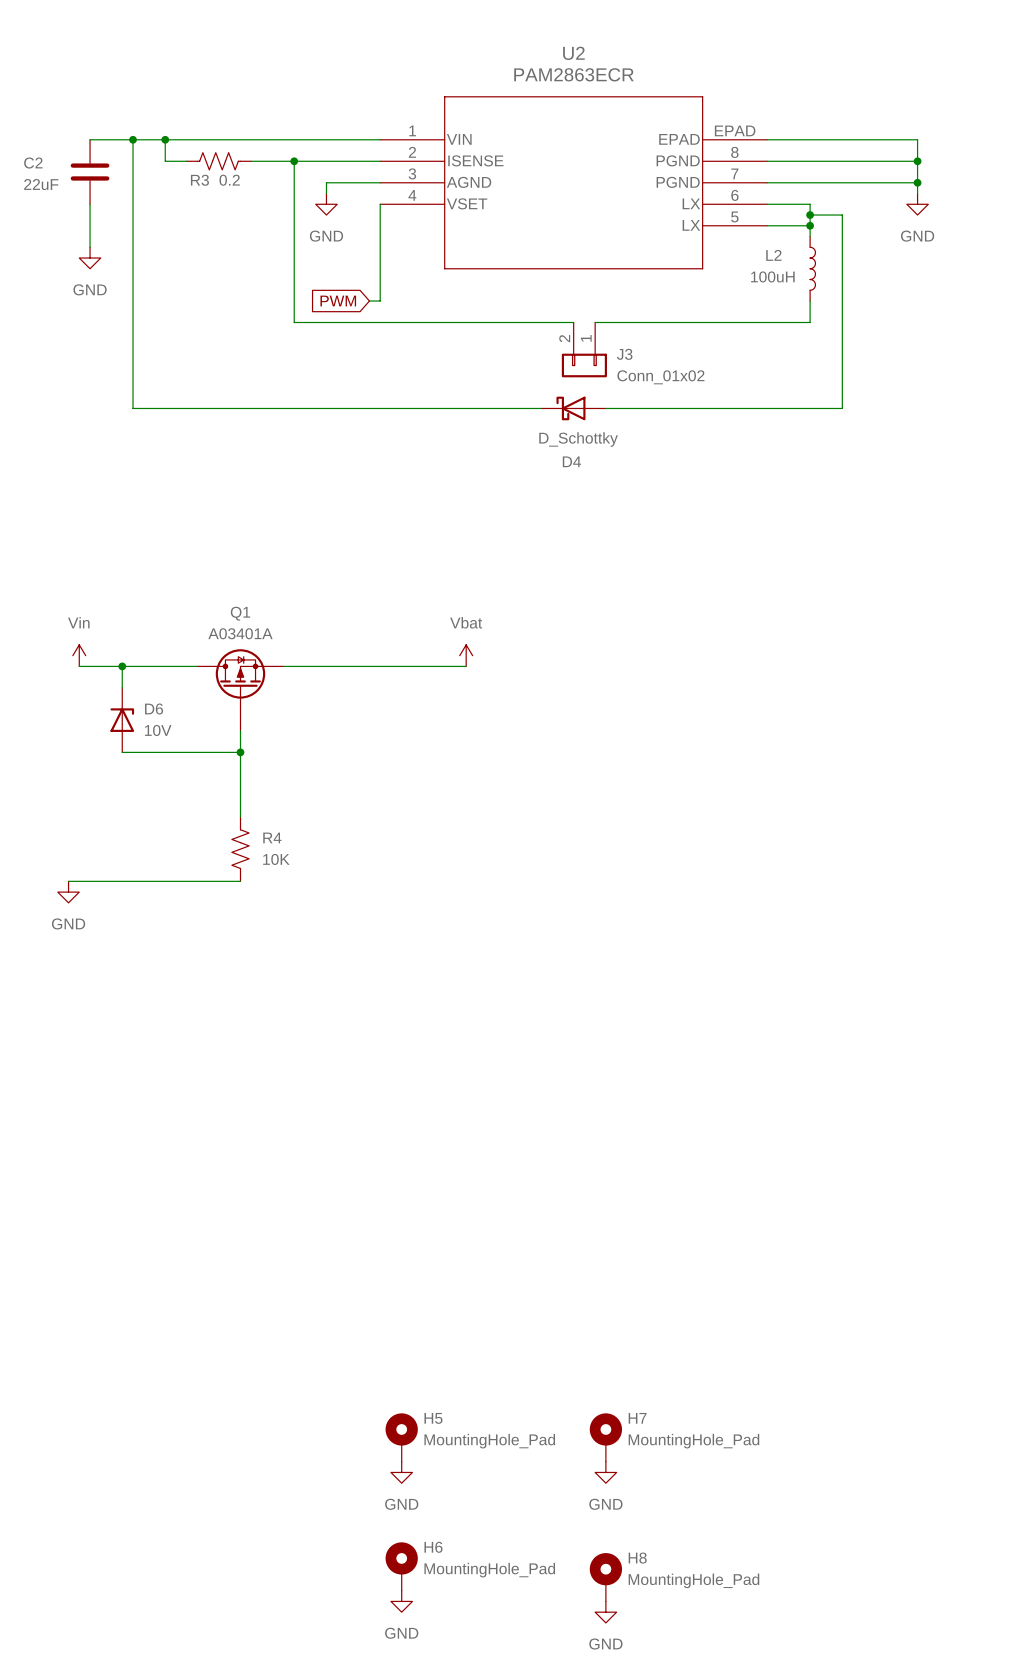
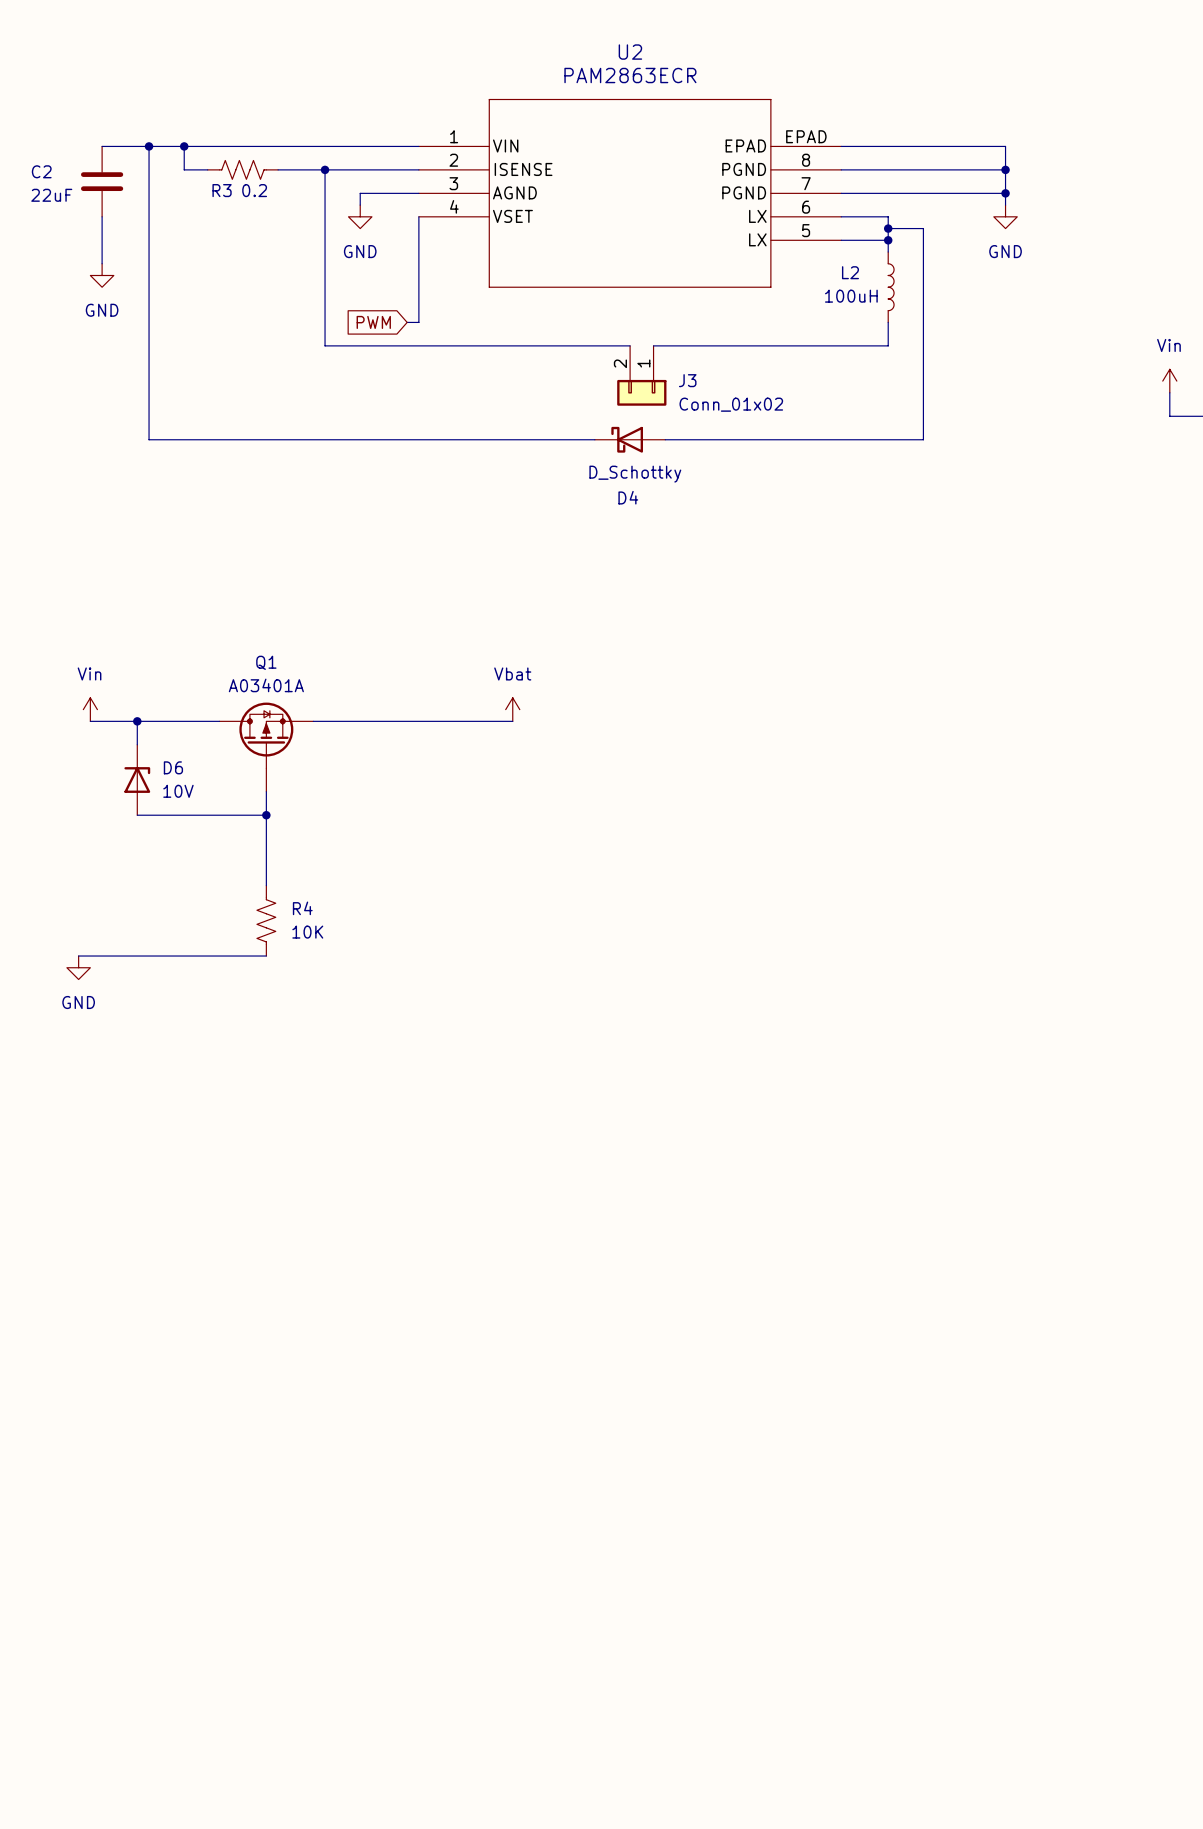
H5: MountingHole_Pad (401, 1437) -> none
H7: MountingHole_Pad (605, 1437) -> none
power symbol: GND (401, 1472) -> none
power symbol: GND (605, 1472) -> none
H6: MountingHole_Pad (401, 1566) -> none
H8: MountingHole_Pad (605, 1577) -> none
power symbol: GND (401, 1601) -> none
power symbol: GND (605, 1612) -> none

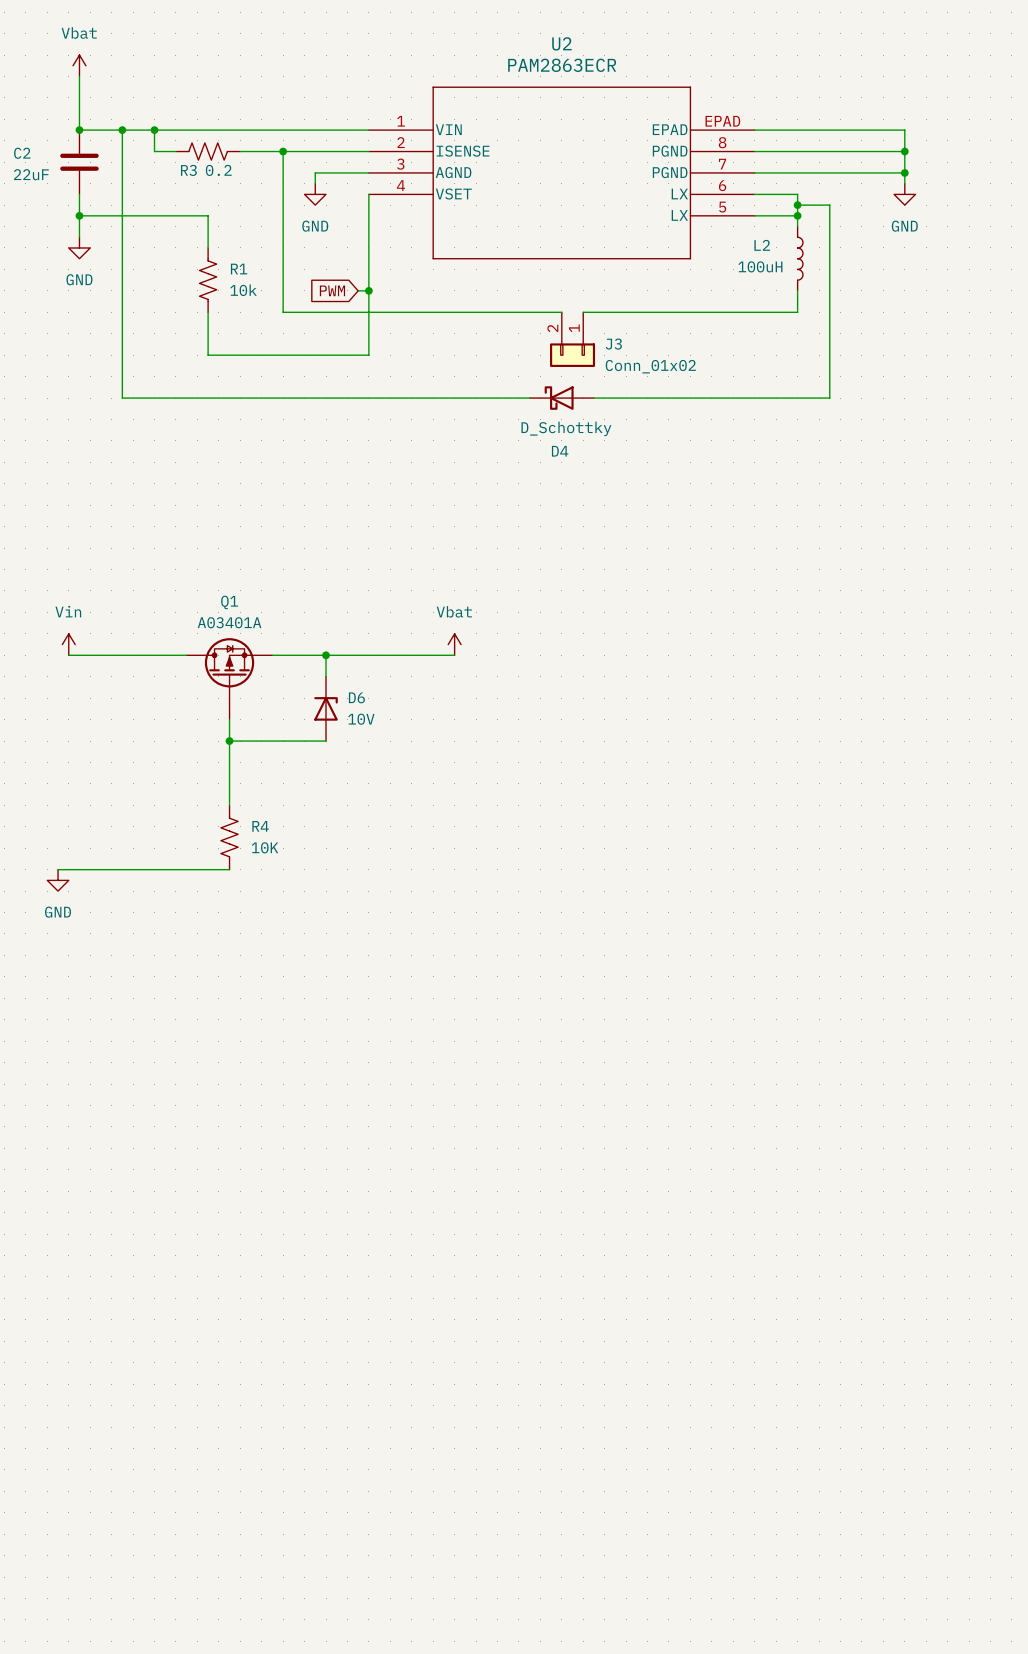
power symbol: none -> Vbat (79, 65)
wire: none -> (79, 76) (79, 130)
junction: none -> (79, 130)
wire: none -> (79, 215) (208, 215) (208, 247)
junction: none -> (79, 215)
R1: none -> 10k (208, 280)
wire: none -> (368, 290) (368, 355) (208, 355) (208, 312)
junction: none -> (368, 290)
wire: (137, 721) (137, 744) -> none
junction: (137, 721) -> none
wire: none -> (326, 655) (326, 676)
junction: none -> (326, 655)
D6 position: (137, 780) -> (326, 708)
wire: (137, 815) (266, 815) -> (326, 741) (229, 741)

